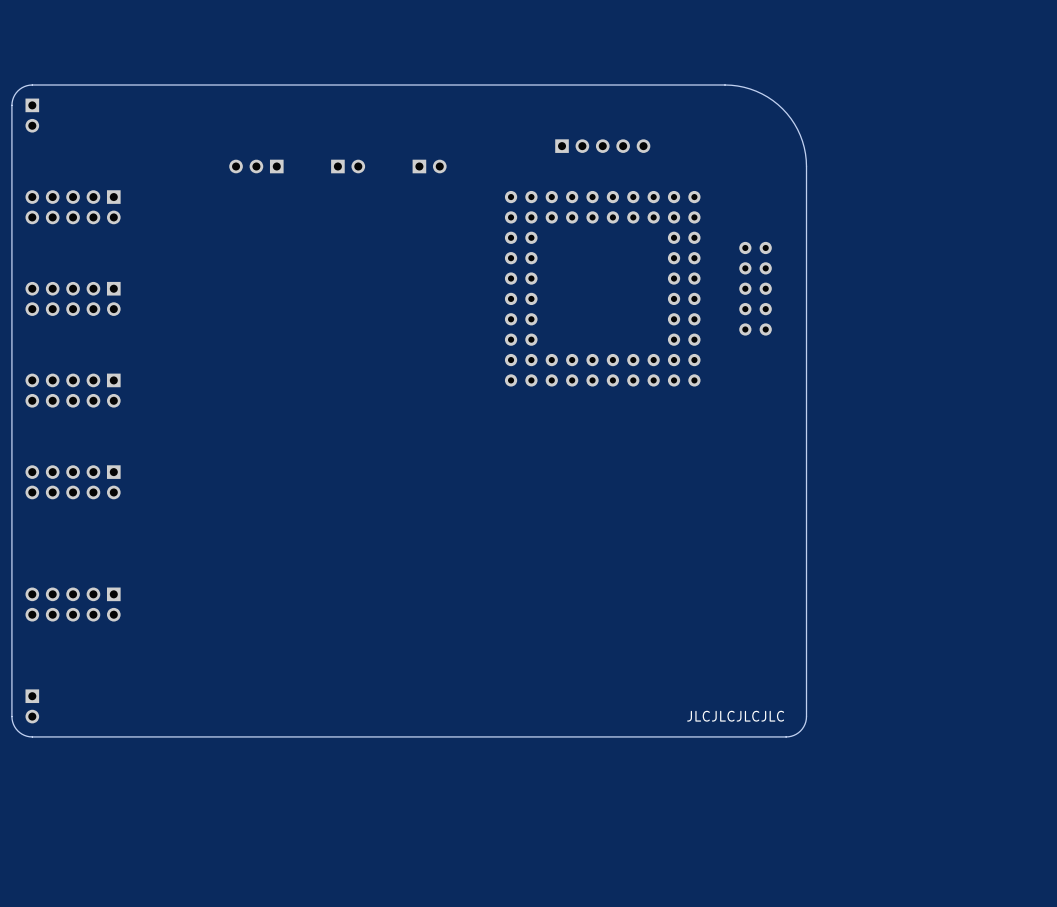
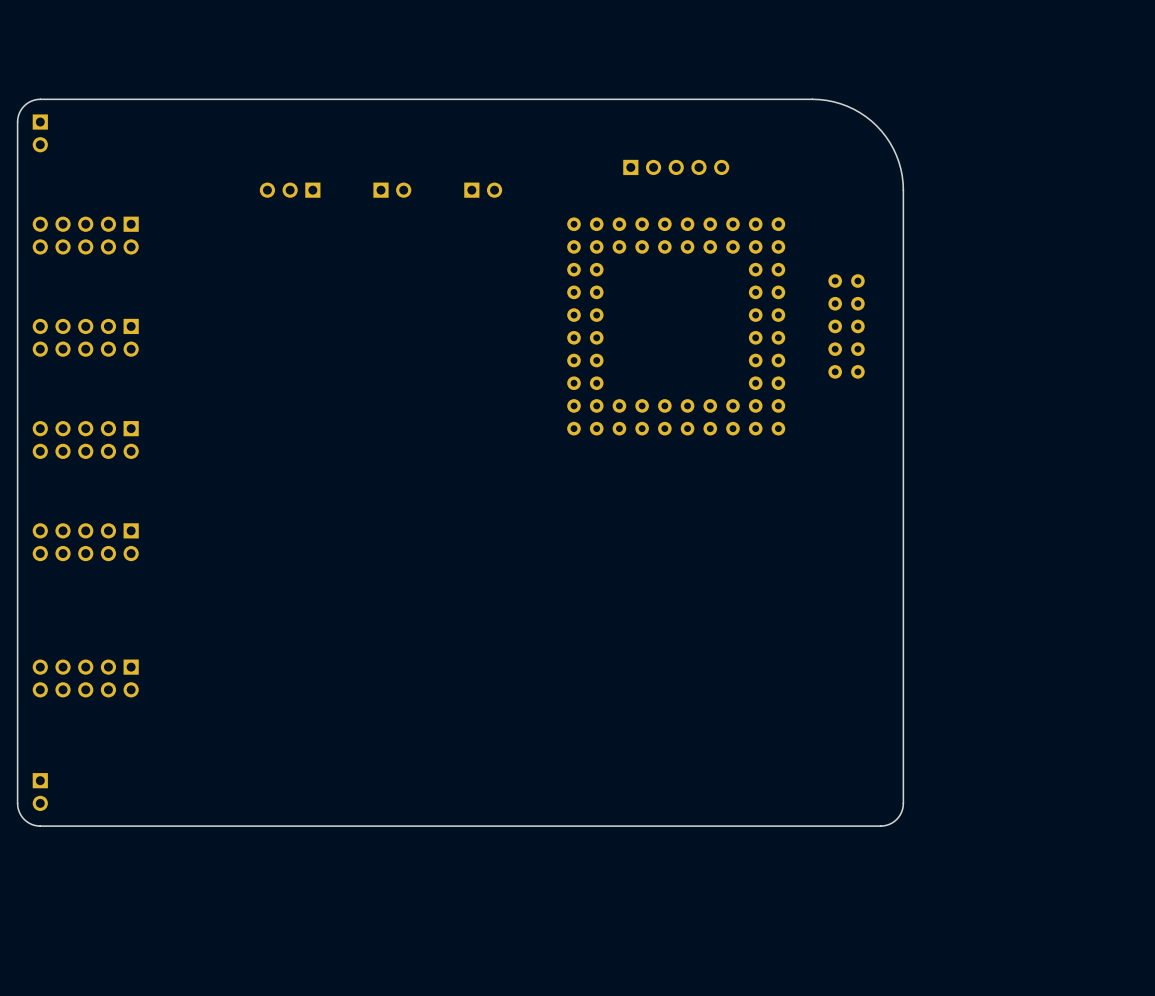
text: JLCJLCJLCJLC (735, 716) -> none

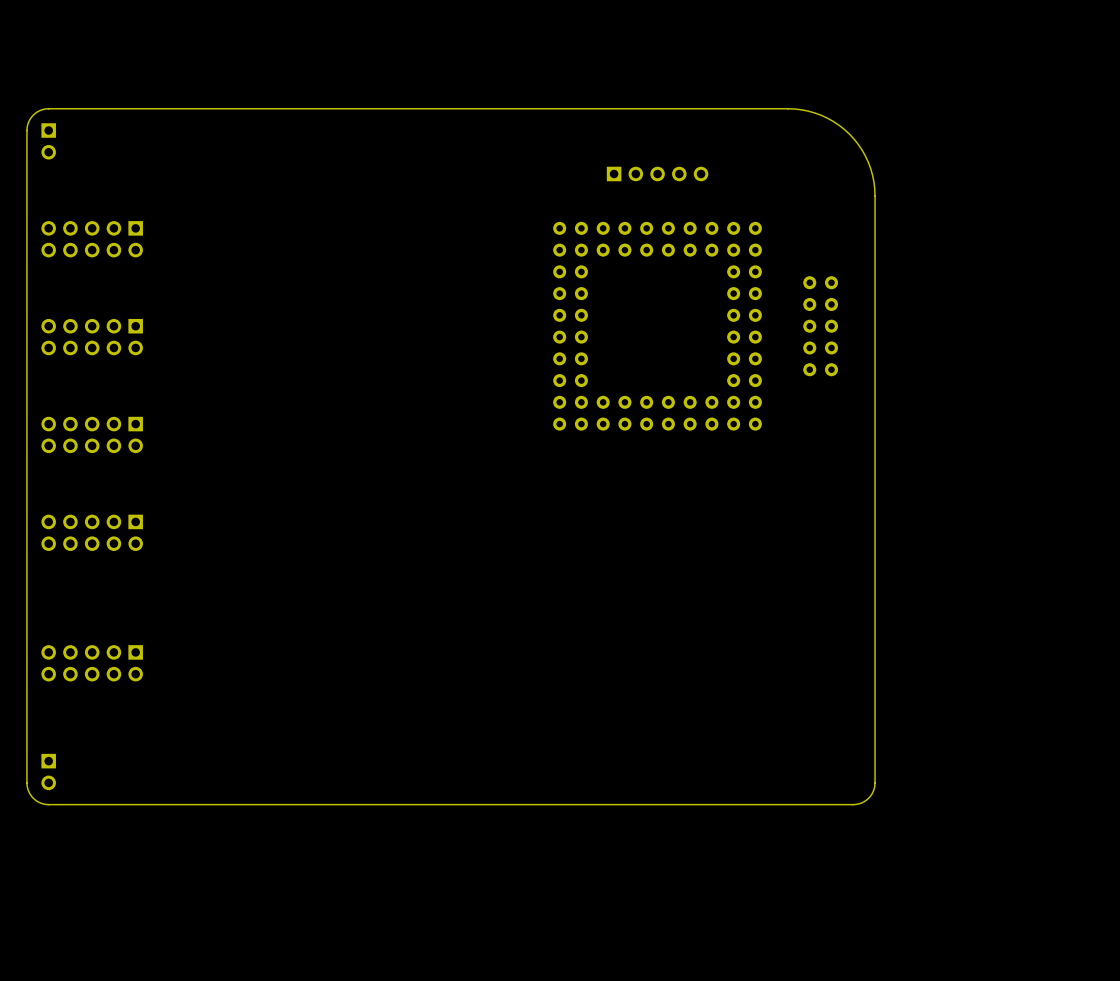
part: (290, 190) -> none
part: (392, 190) -> none
part: (483, 190) -> none

